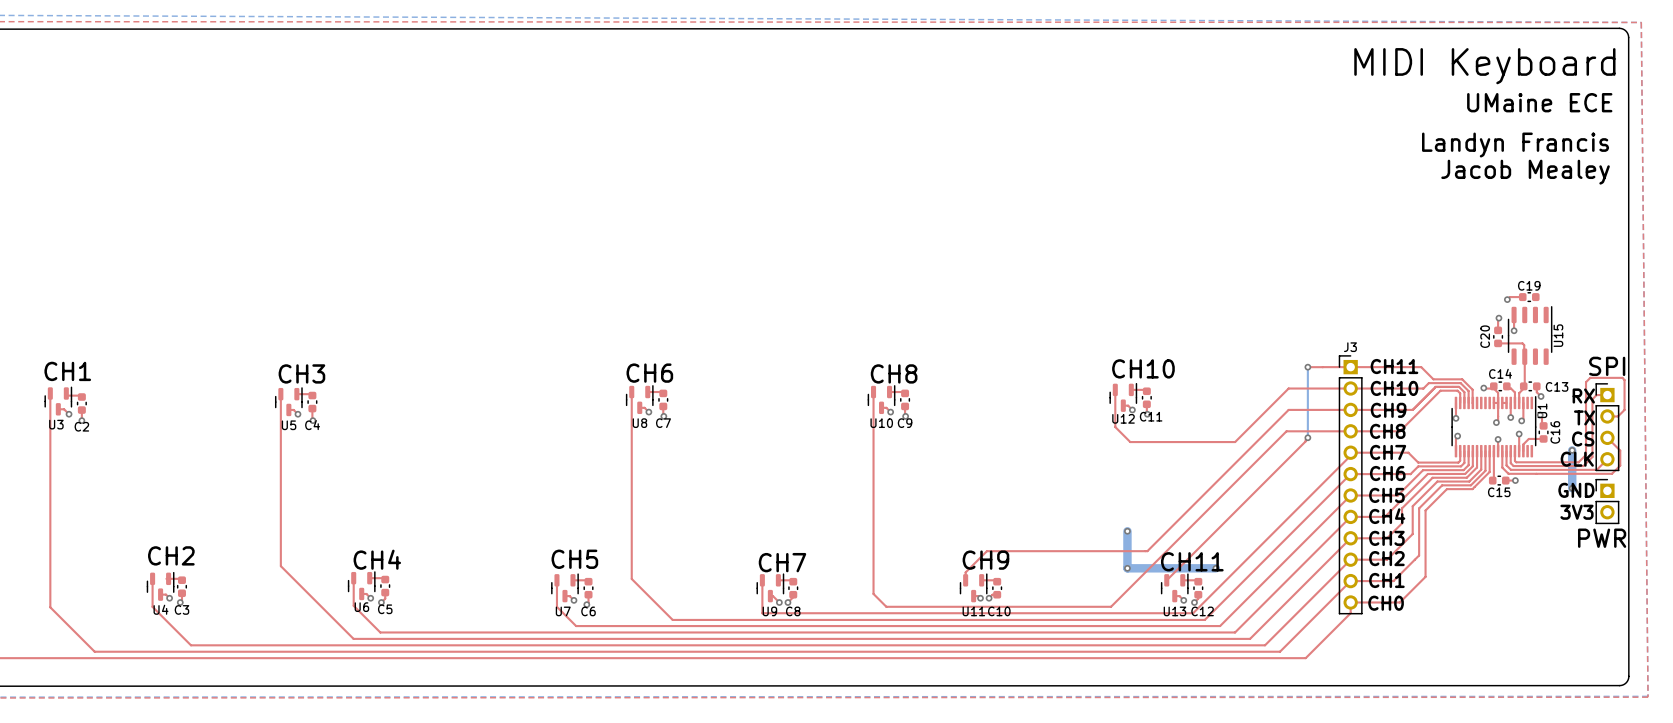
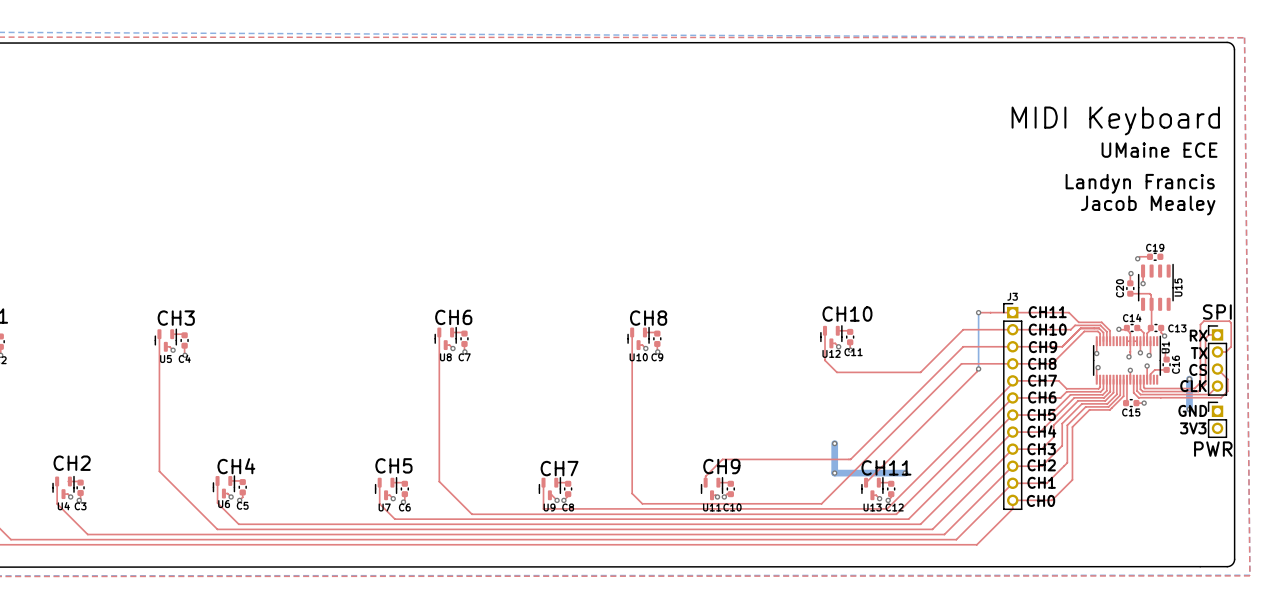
text position: MIDI Keyboard (1484, 66) -> MIDI Keyboard (1115, 120)
text position: UMaine ECE (1539, 102) -> UMaine ECE (1159, 150)
text position: Landyn Francis (1515, 145) -> Landyn Francis (1140, 183)
text position: Jacob Mealey (1525, 172) -> Jacob Mealey (1148, 205)

